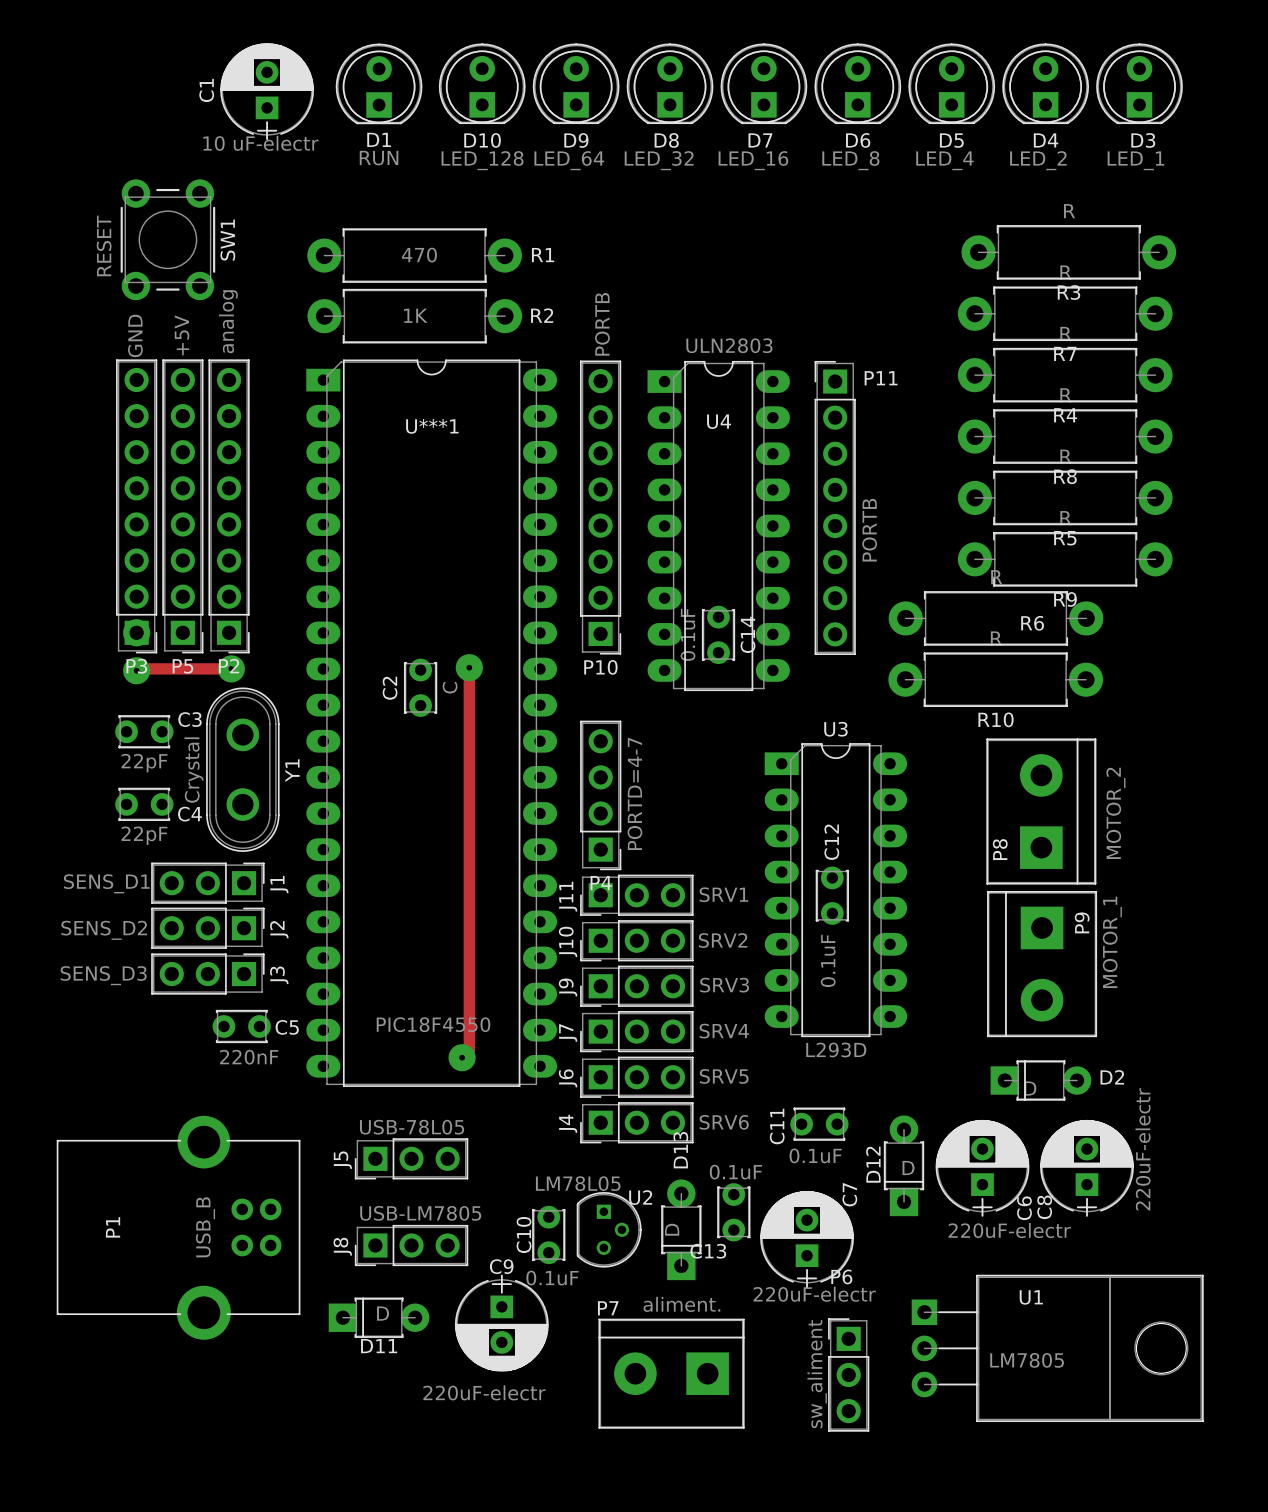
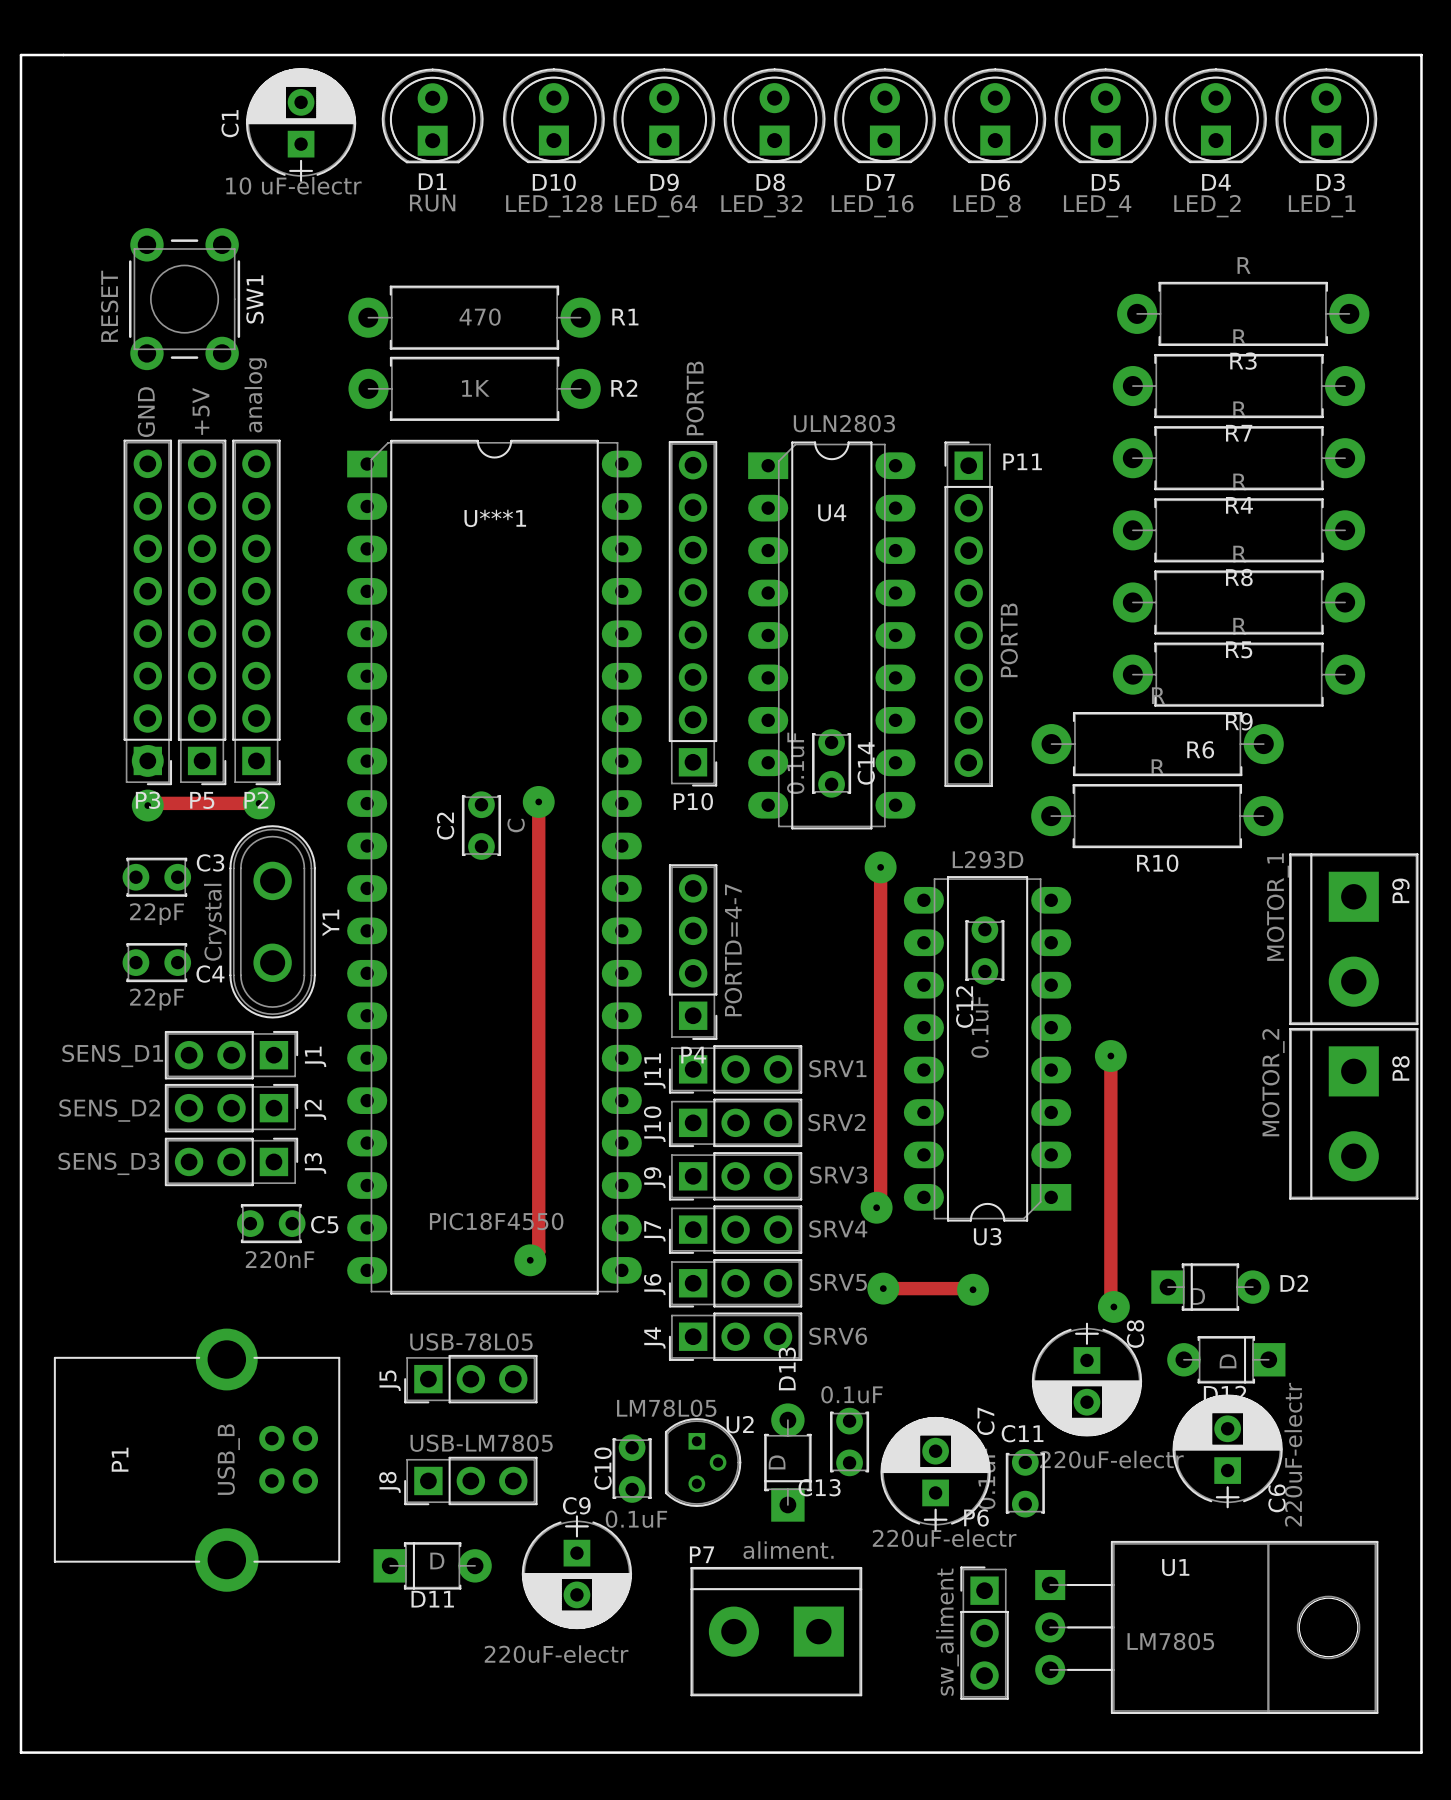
board edge: none -> (20, 55) (1421, 55) (1421, 1752) (20, 1752) (20, 55)
track: none -> (880, 867) (880, 1203) (876, 1207)
via: none -> (880, 867)
P8 rotation: 0° (1041, 811) -> 180° (1353, 1113)
P8 position: (1041, 811) -> (1353, 1113)
track: none -> (1110, 1056) (1110, 1303) (1113, 1306)
via: none -> (1110, 1056)
U3 rotation: 0° (835, 890) -> 180° (987, 1048)
C12 position: (832, 895) -> (984, 950)
P9 value position: MOTOR_1 (1112, 942) -> MOTOR_1 (1278, 907)
P9 position: (1042, 964) -> (1353, 939)
via: none -> (876, 1207)
track: none -> (883, 1288) (973, 1289)
via: none -> (883, 1288)
via: none -> (973, 1289)
via: none -> (1113, 1306)
C11 rotation: 0° (819, 1124) -> 90° clockwise (1025, 1483)
C11 position: (819, 1124) -> (1025, 1483)
C8 value position: 220uF-electr (1143, 1149) -> 220uF-electr (1111, 1459)
D12 rotation: 0° (904, 1165) -> 90° counterclockwise (1226, 1359)
D12 position: (904, 1165) -> (1226, 1359)
C6 position: (982, 1168) -> (1227, 1451)
C8 rotation: 0° (1086, 1168) -> 180° (1086, 1379)
C8 position: (1086, 1168) -> (1086, 1379)
C6 value rotation: 0° (1009, 1230) -> 90° counterclockwise (1293, 1454)
U1 position: (1057, 1348) -> (1206, 1627)

